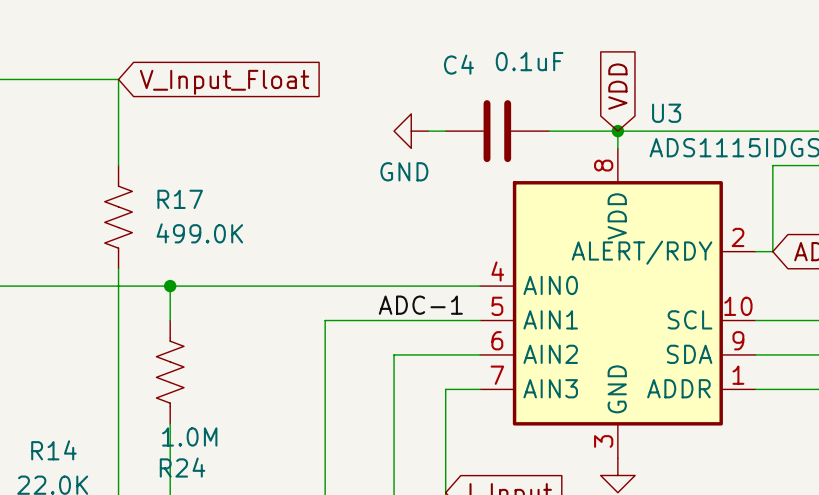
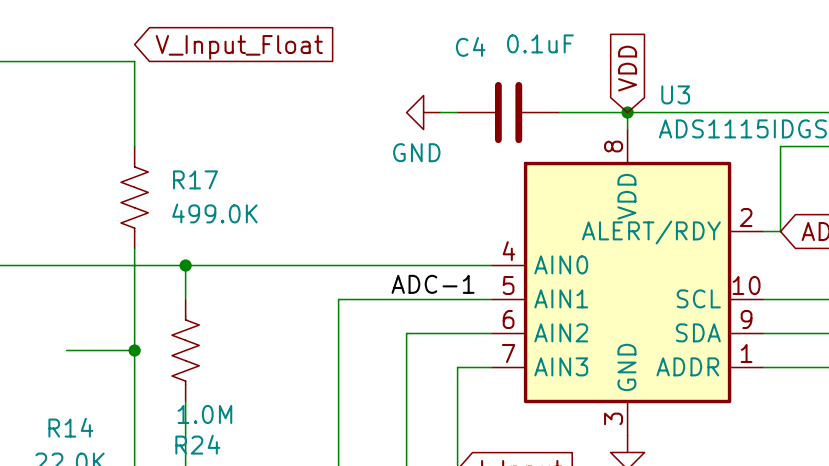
global label position: V_Input_Float (224, 82) -> V_Input_Float (239, 47)
wire: none -> (66, 350) (134, 350)
junction: none -> (134, 350)

